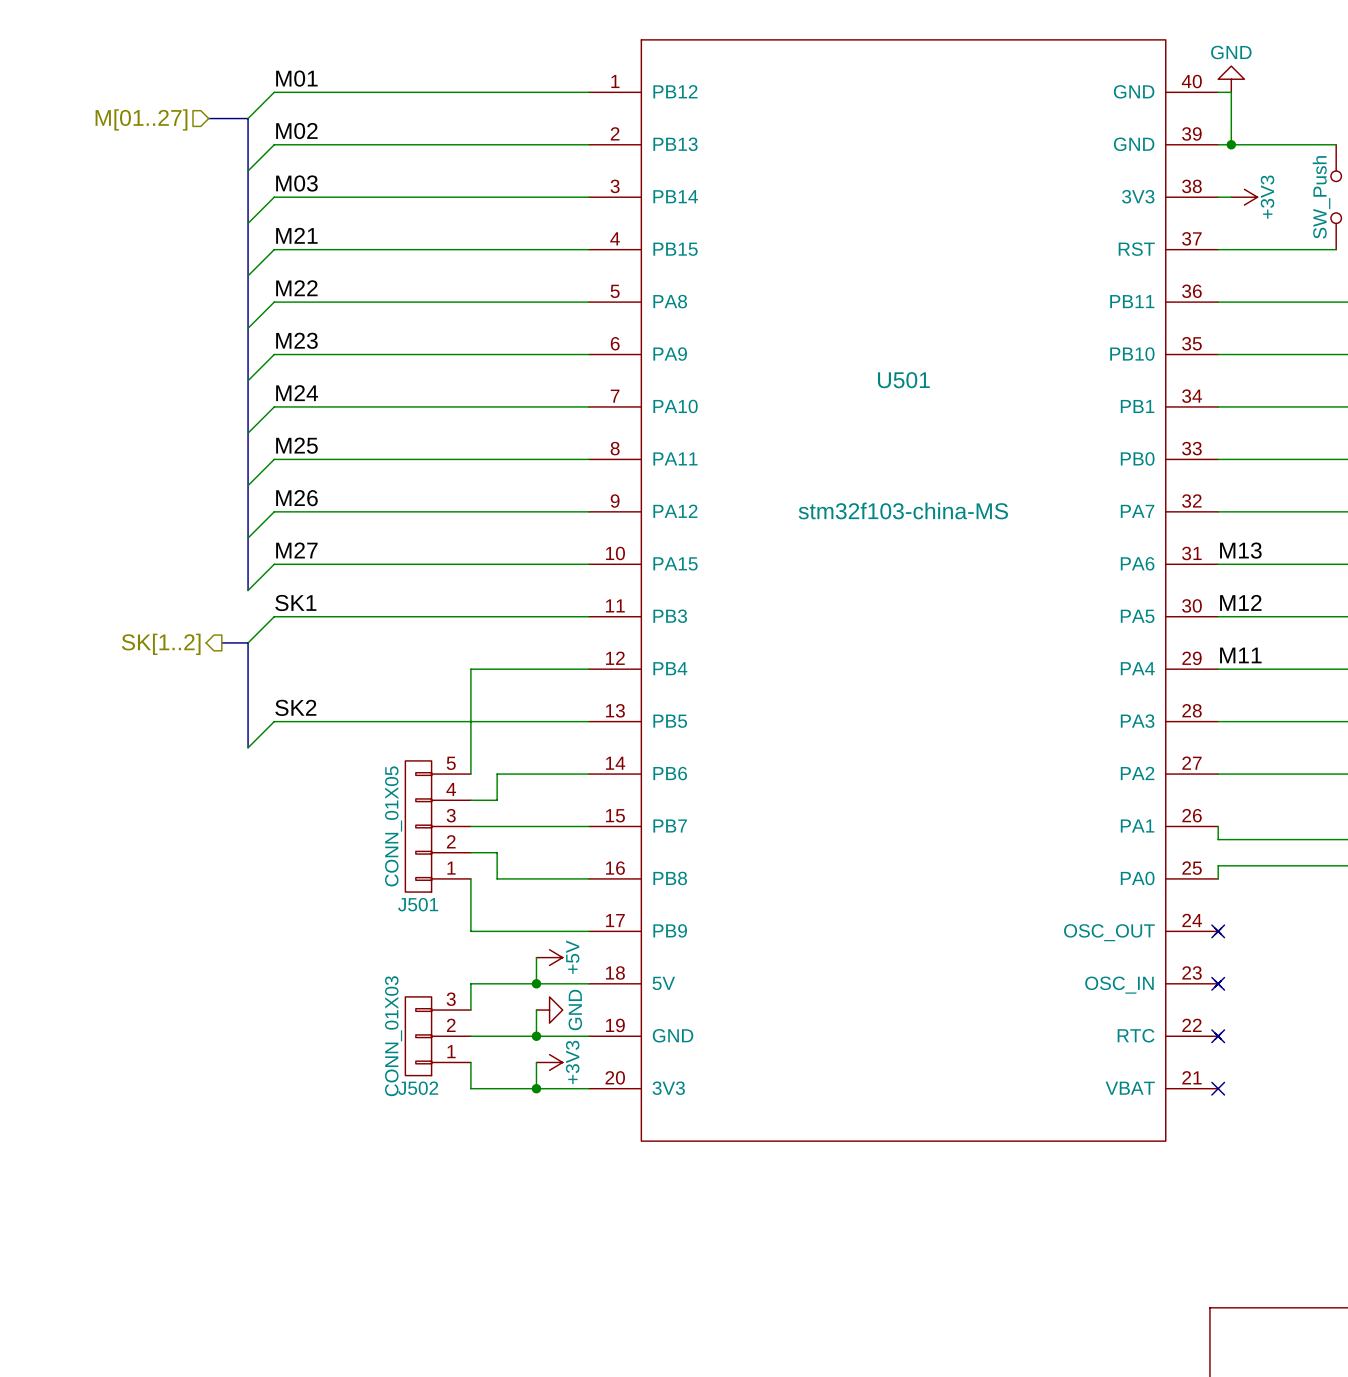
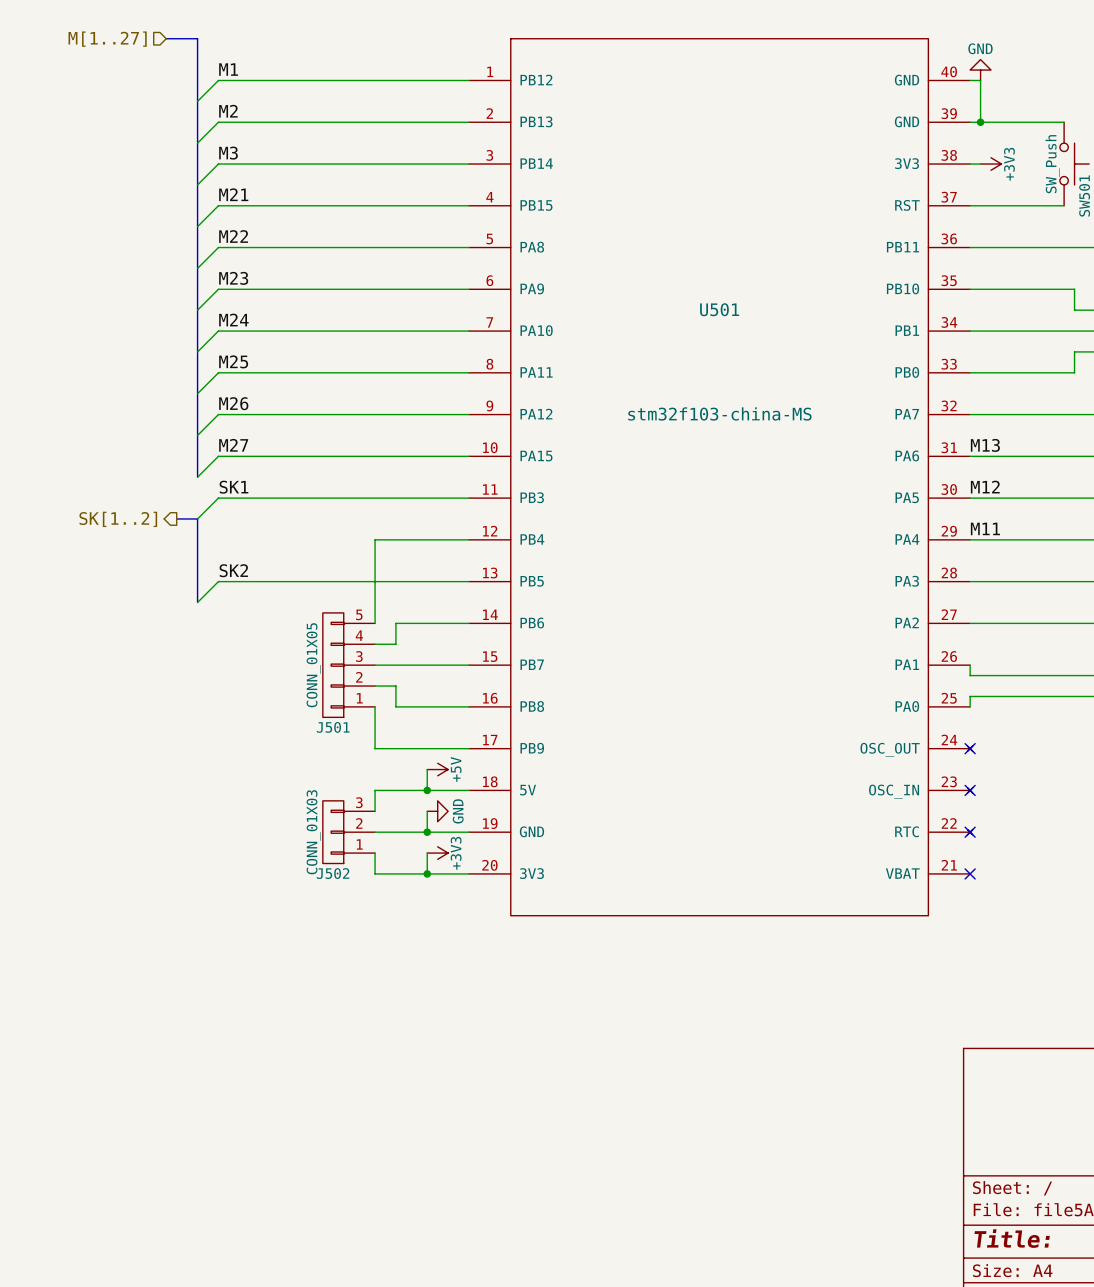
hierarchical label: none -> M[1..27] (107, 39)
label: M01 (296, 78) -> M1 (228, 69)
bus: (208, 118) (248, 118) -> (166, 38) (197, 38) (197, 101)
hierarchical label: M[01..27] (141, 119) -> none
label: M02 (296, 131) -> M2 (228, 111)
label: M03 (296, 183) -> M3 (228, 153)

